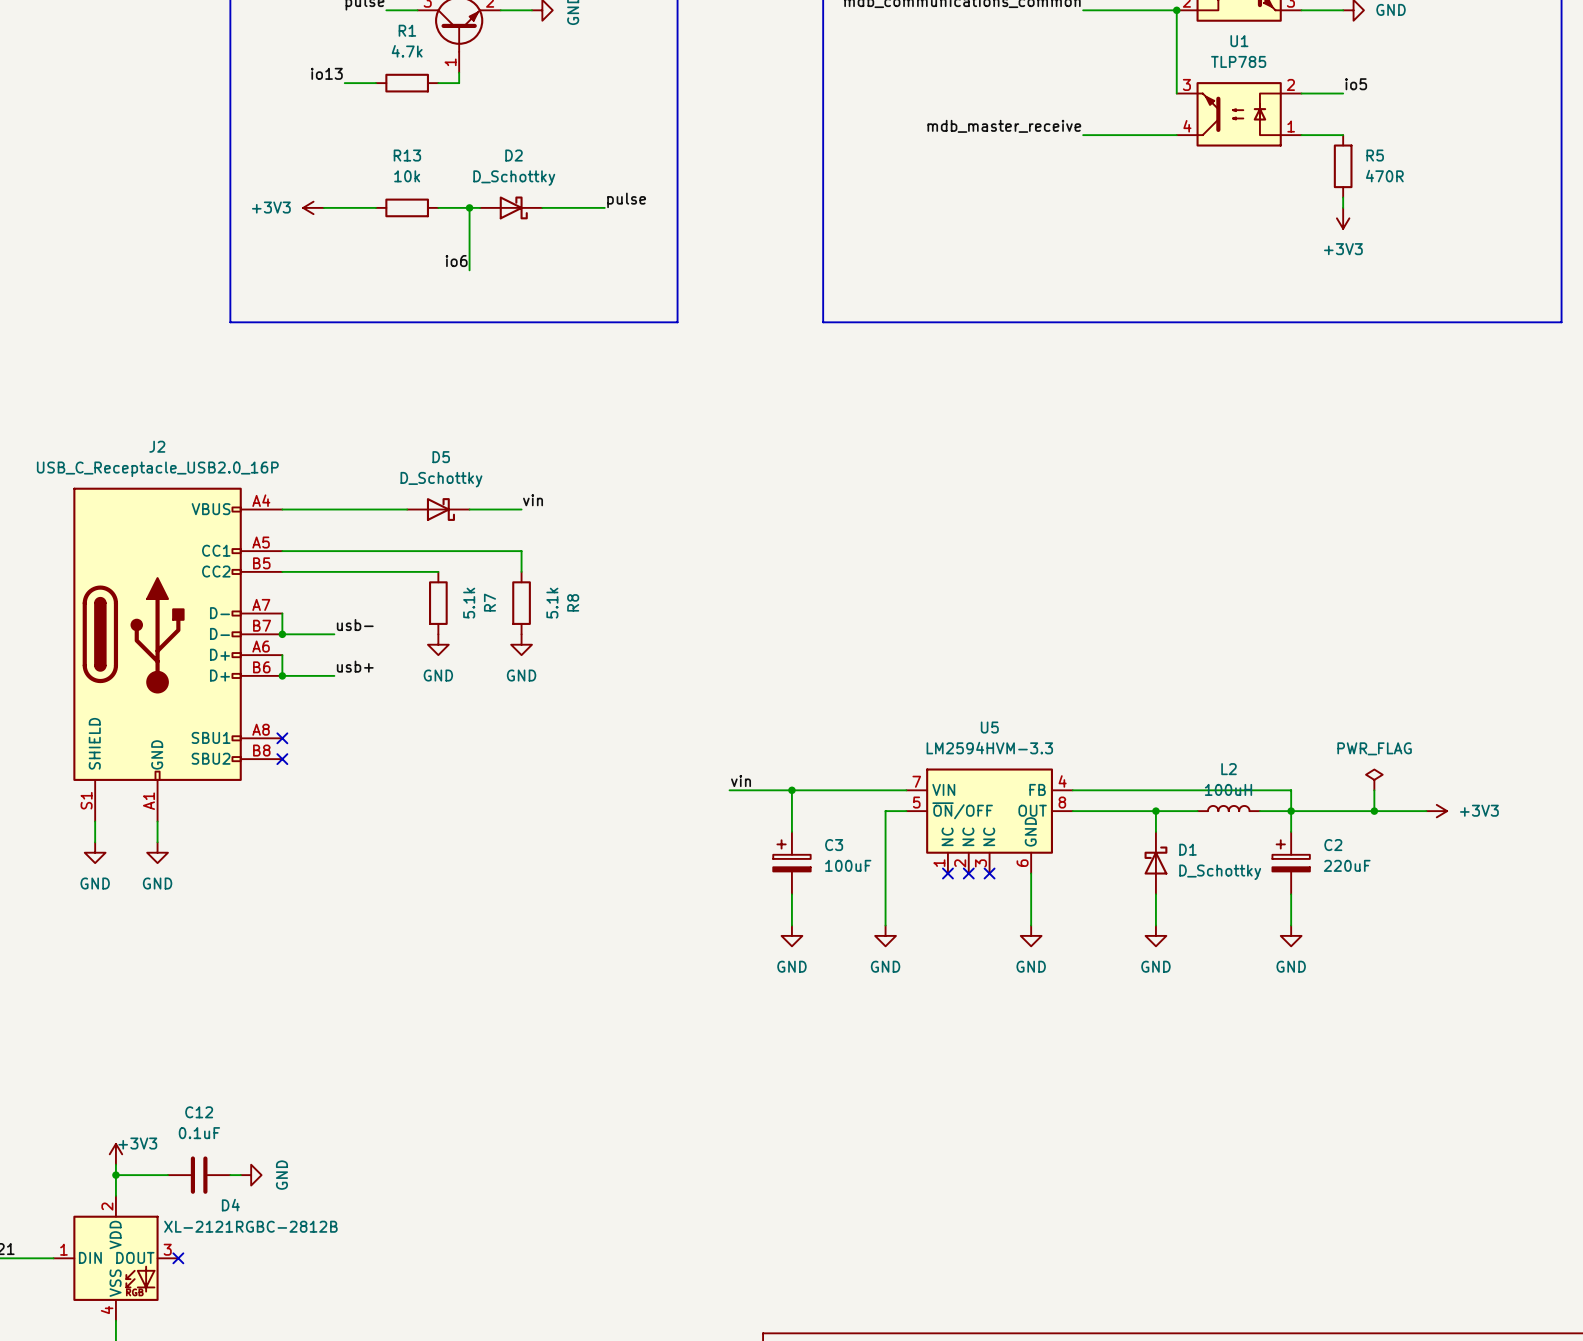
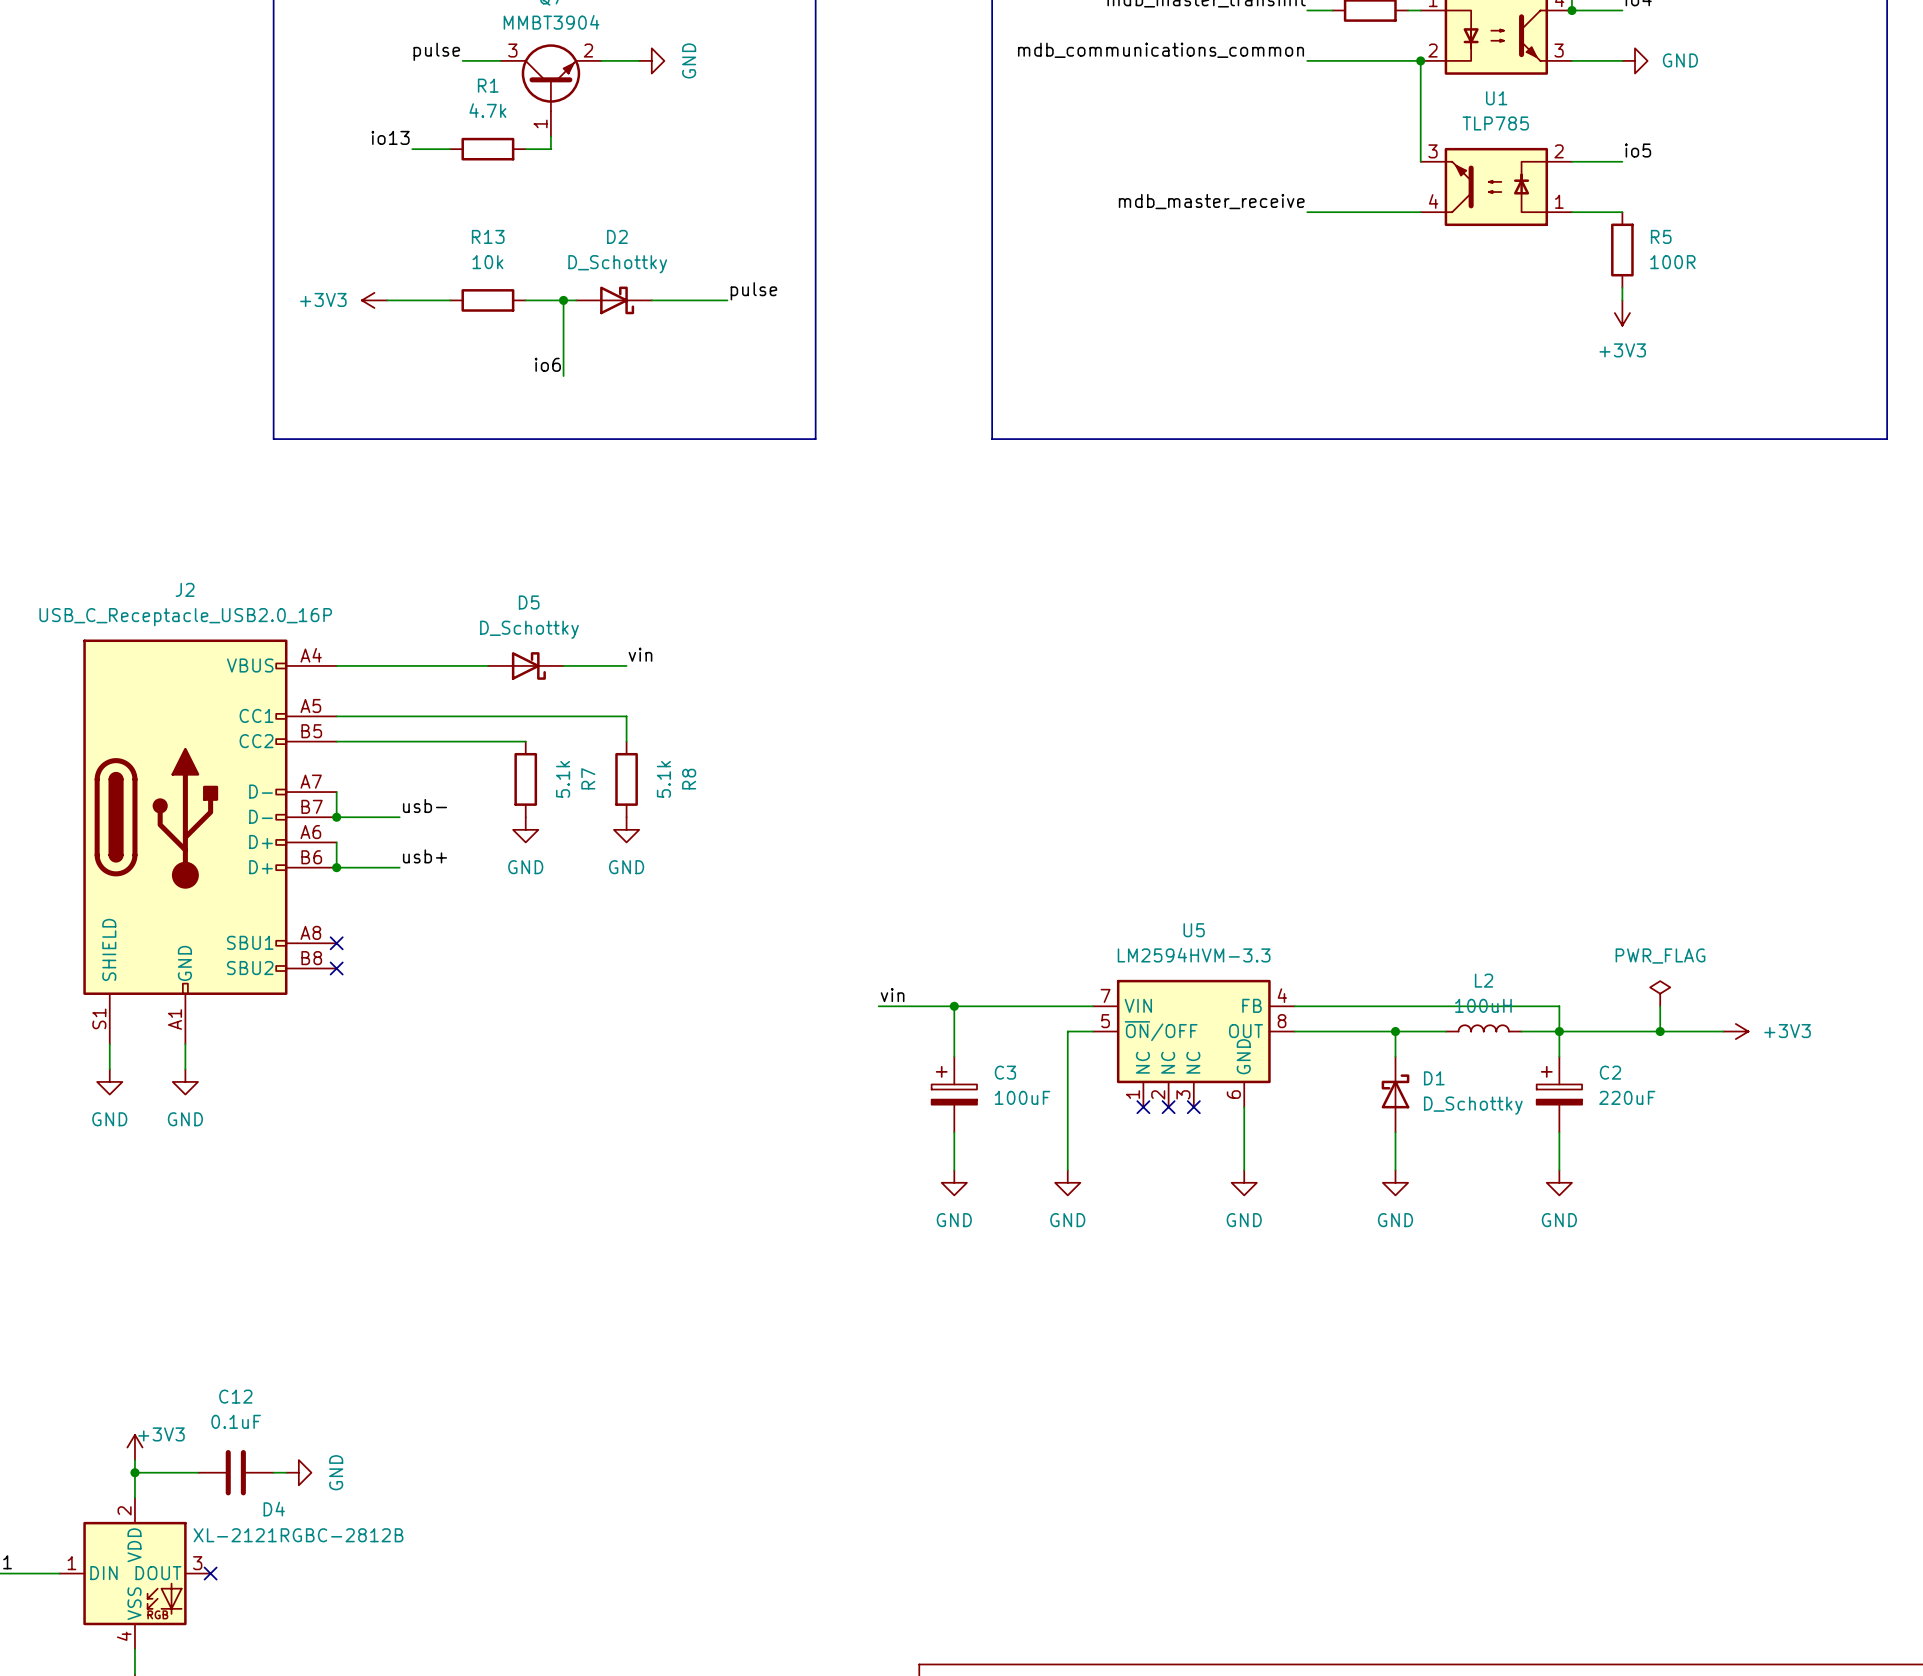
R5 value: 470R (1384, 176) -> 100R (1672, 262)

